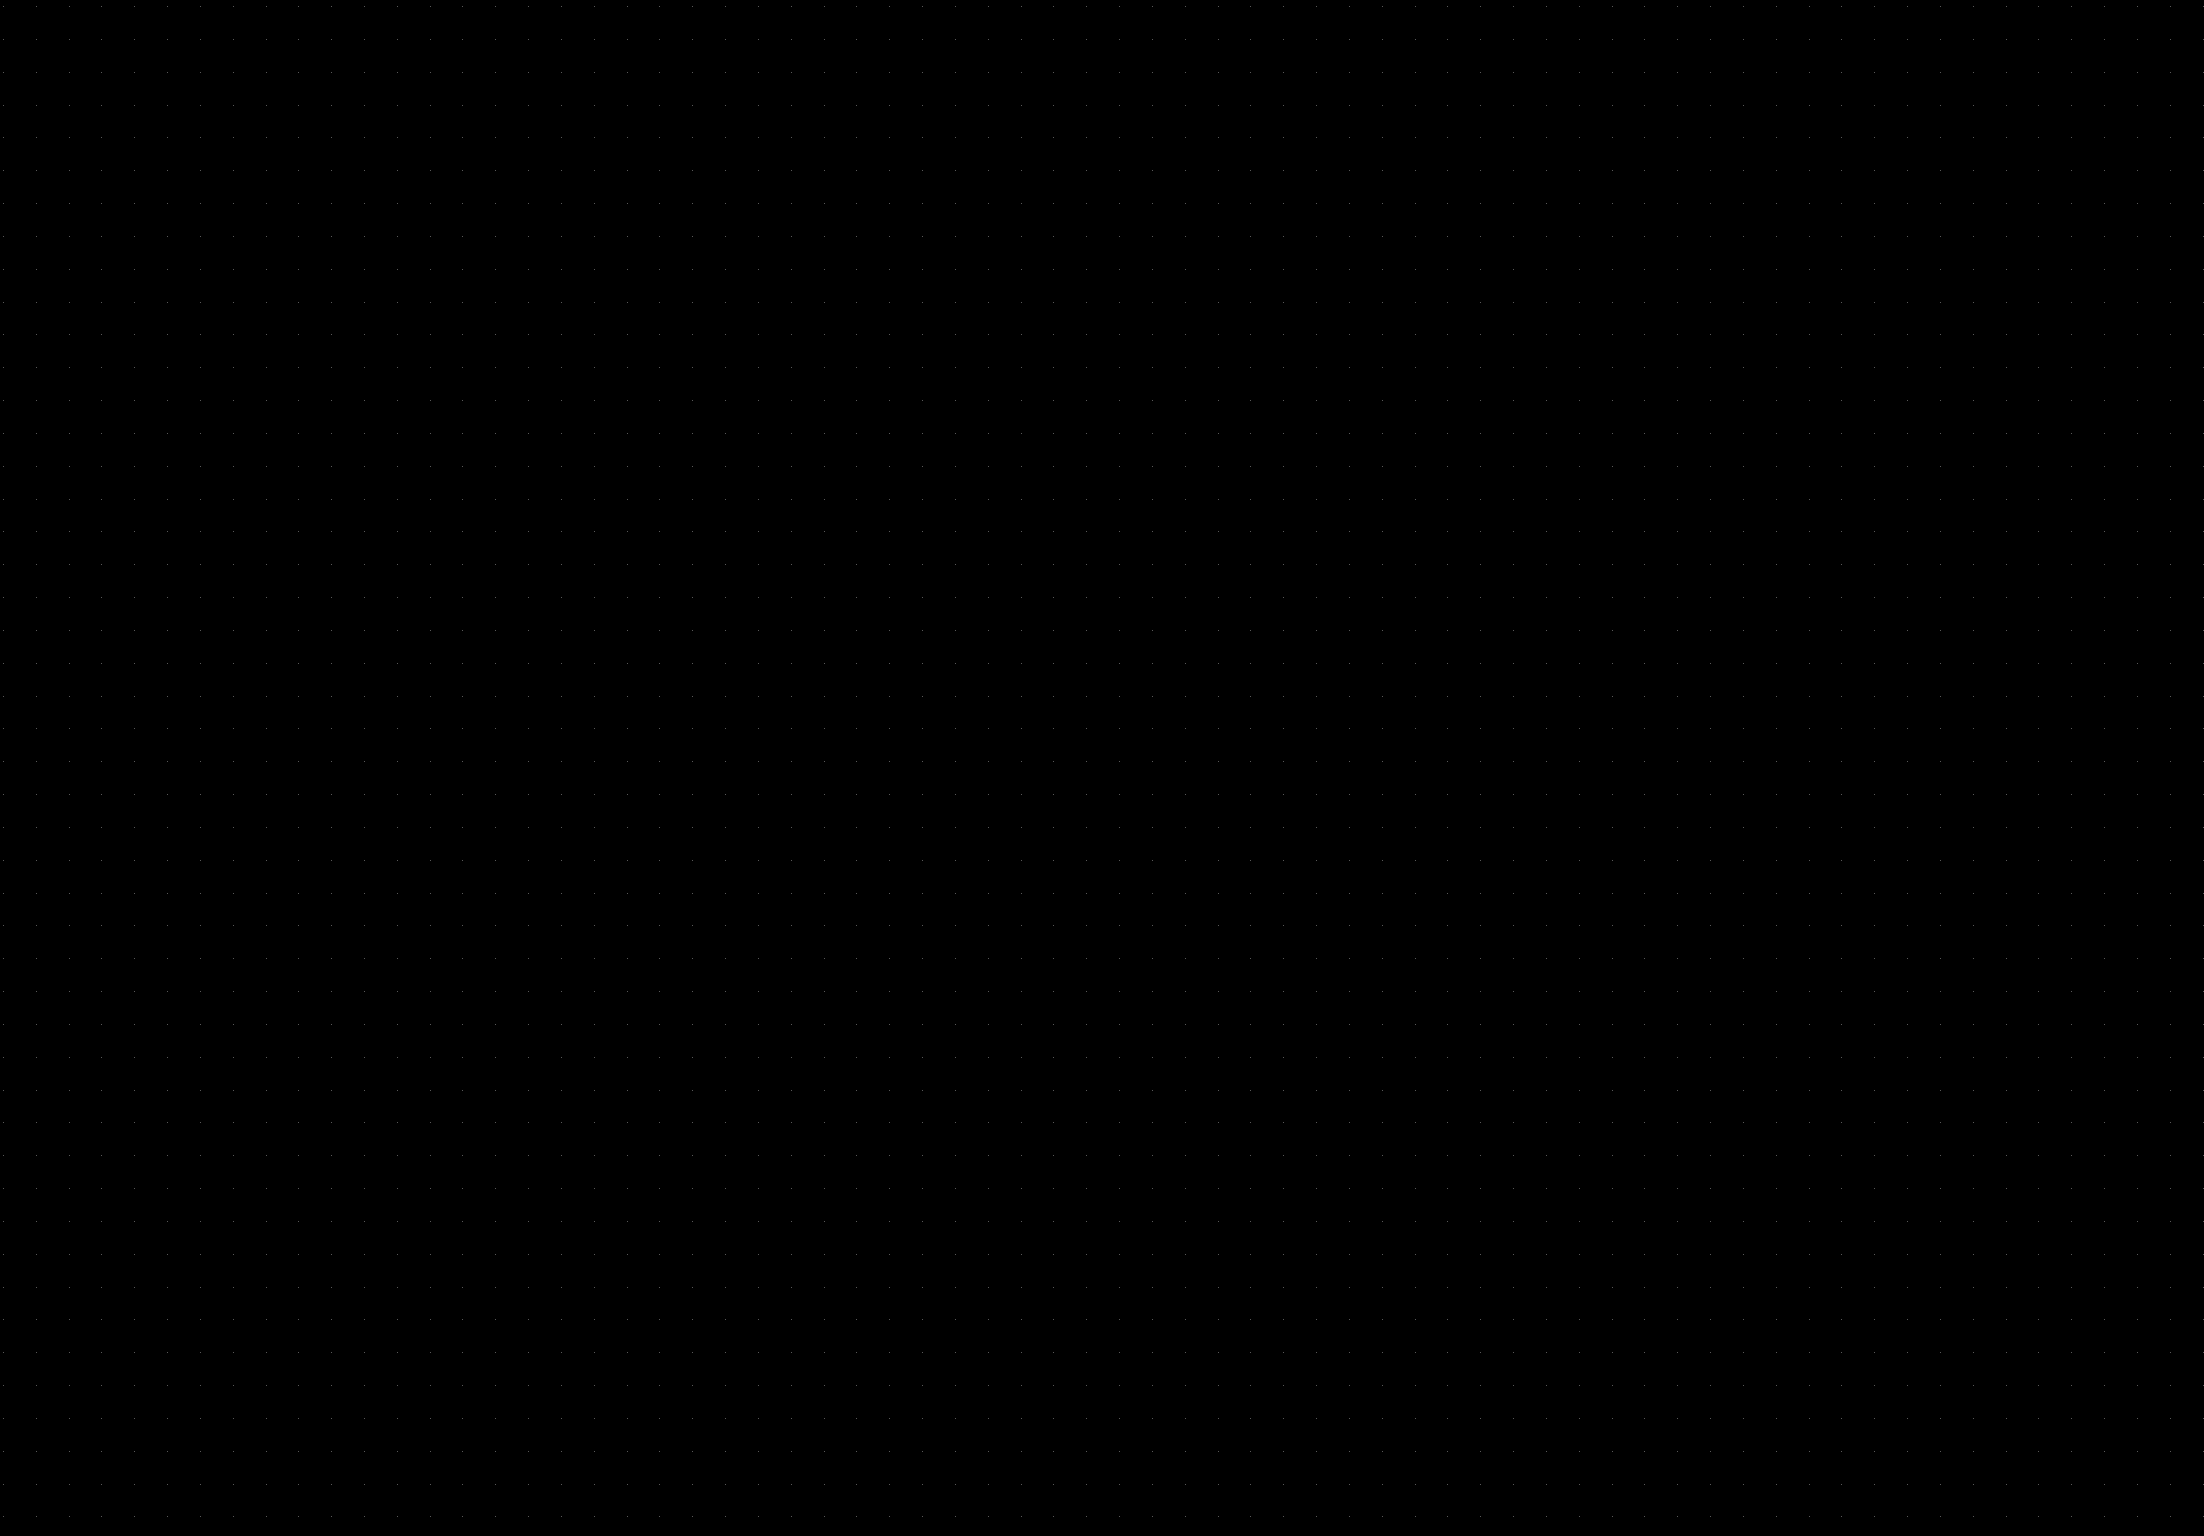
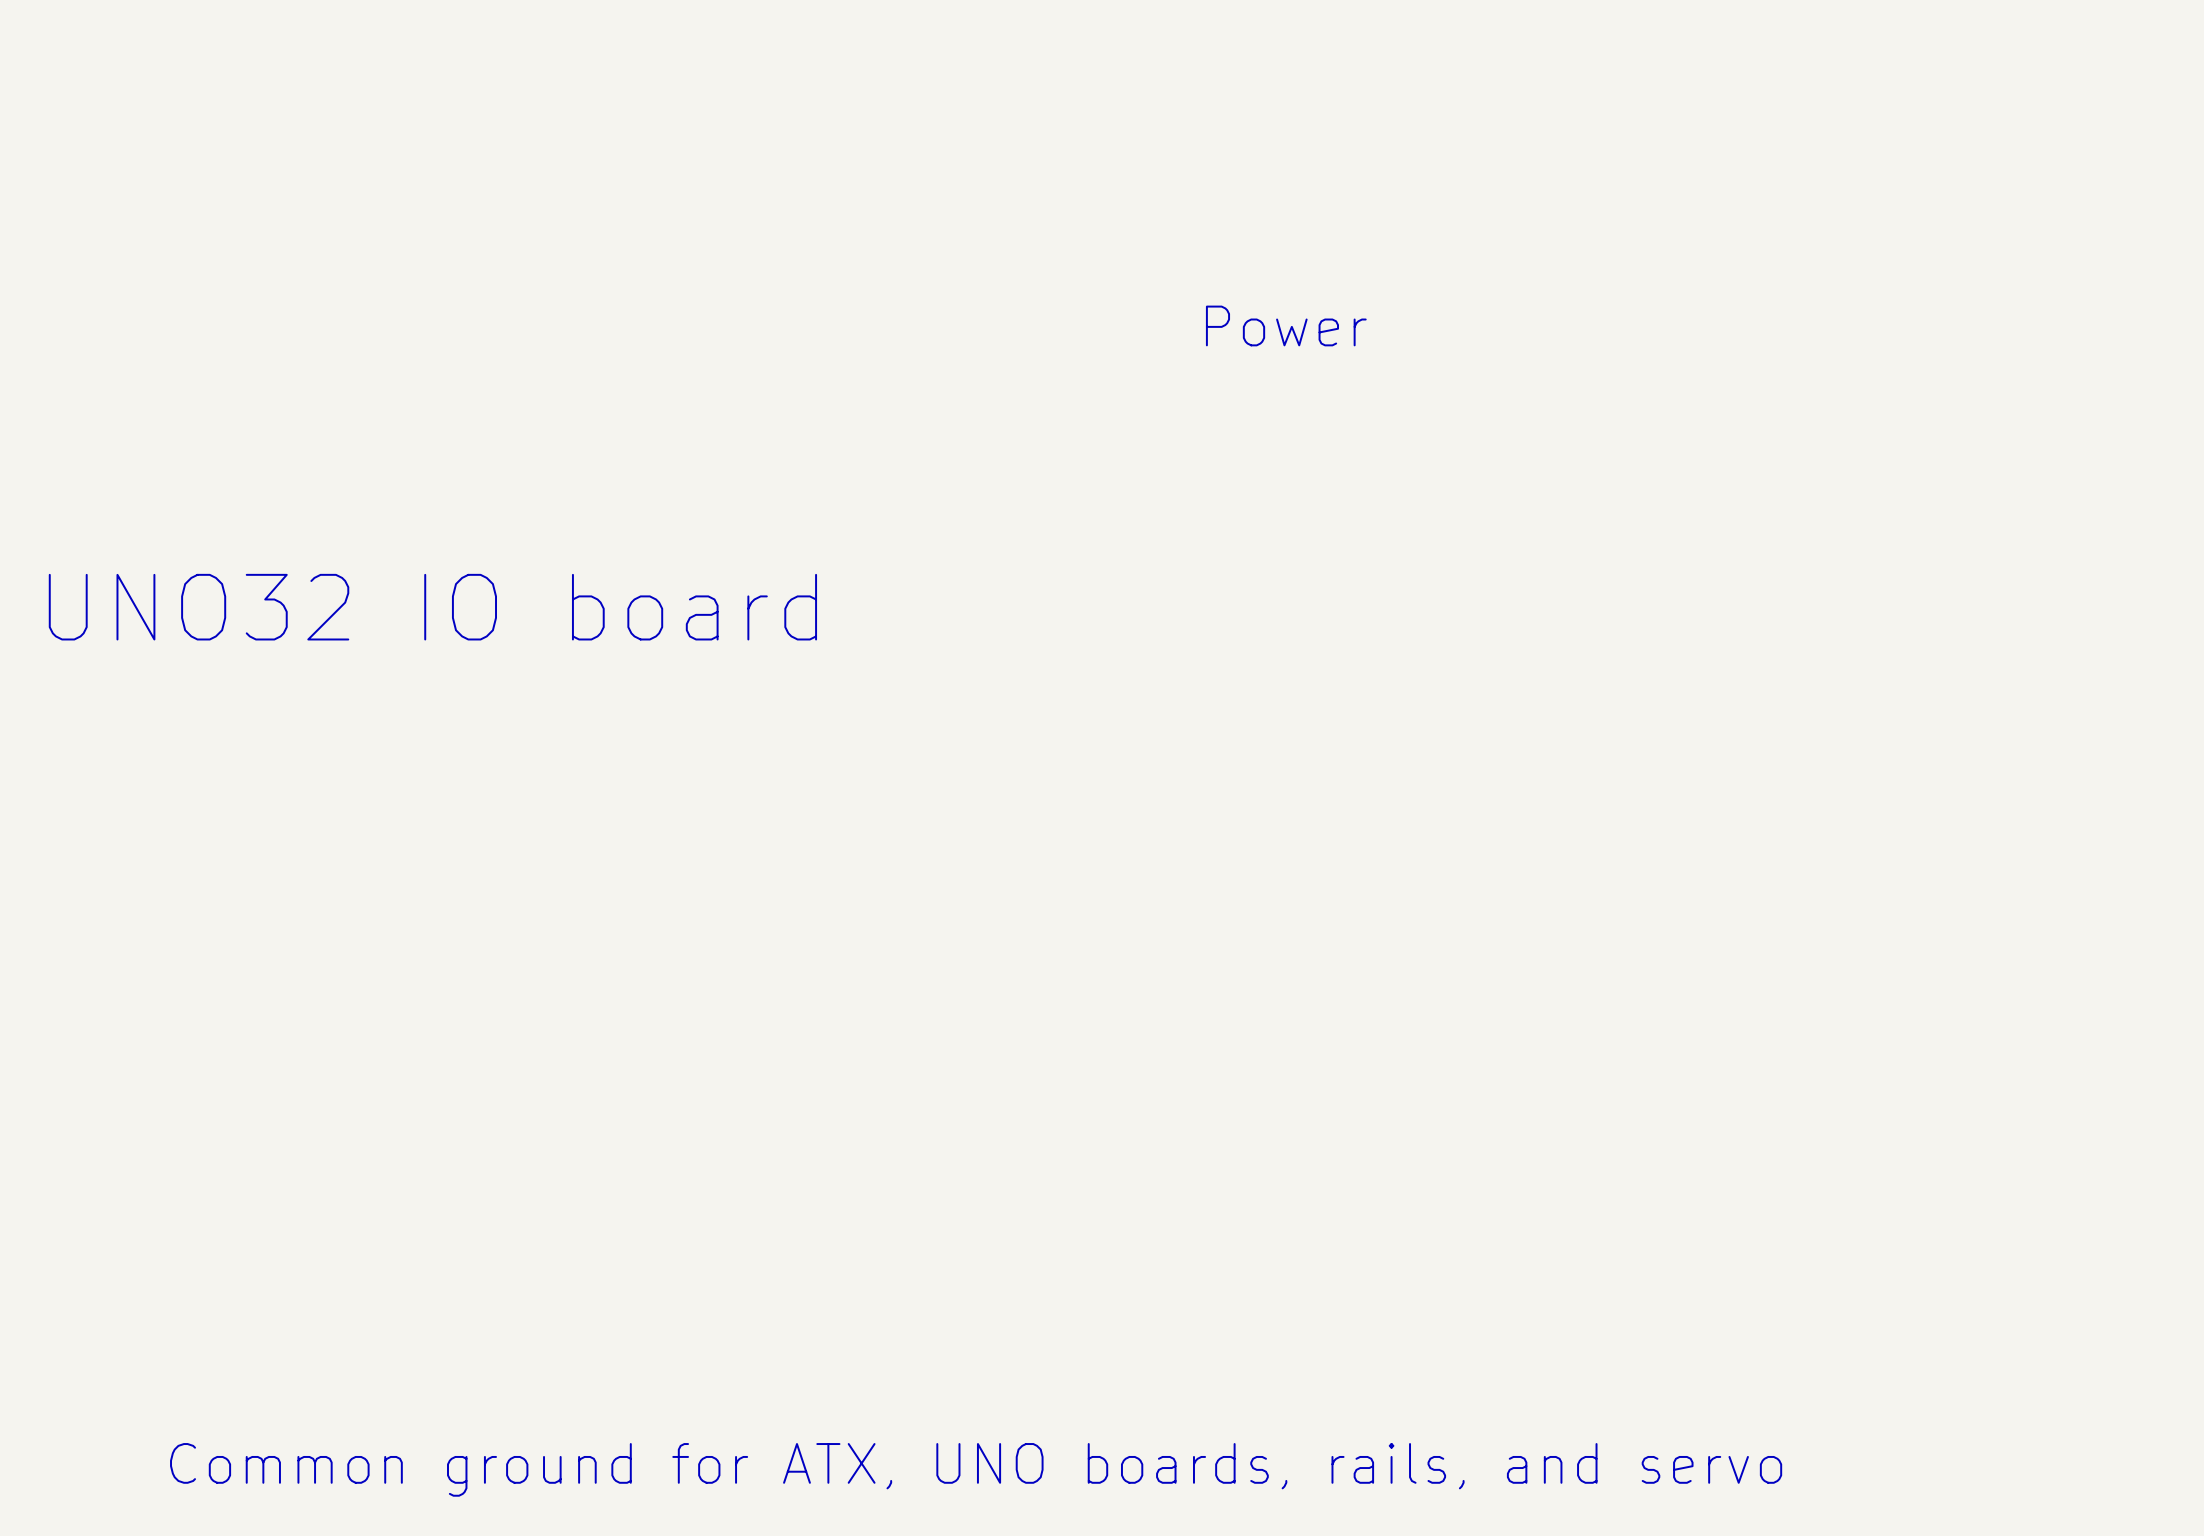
text: none -> Power (1286, 325)
text: none -> UNO32 IO board (432, 607)
text: none -> Common ground for ATX, UNO boards, rails, and servo (976, 1469)

